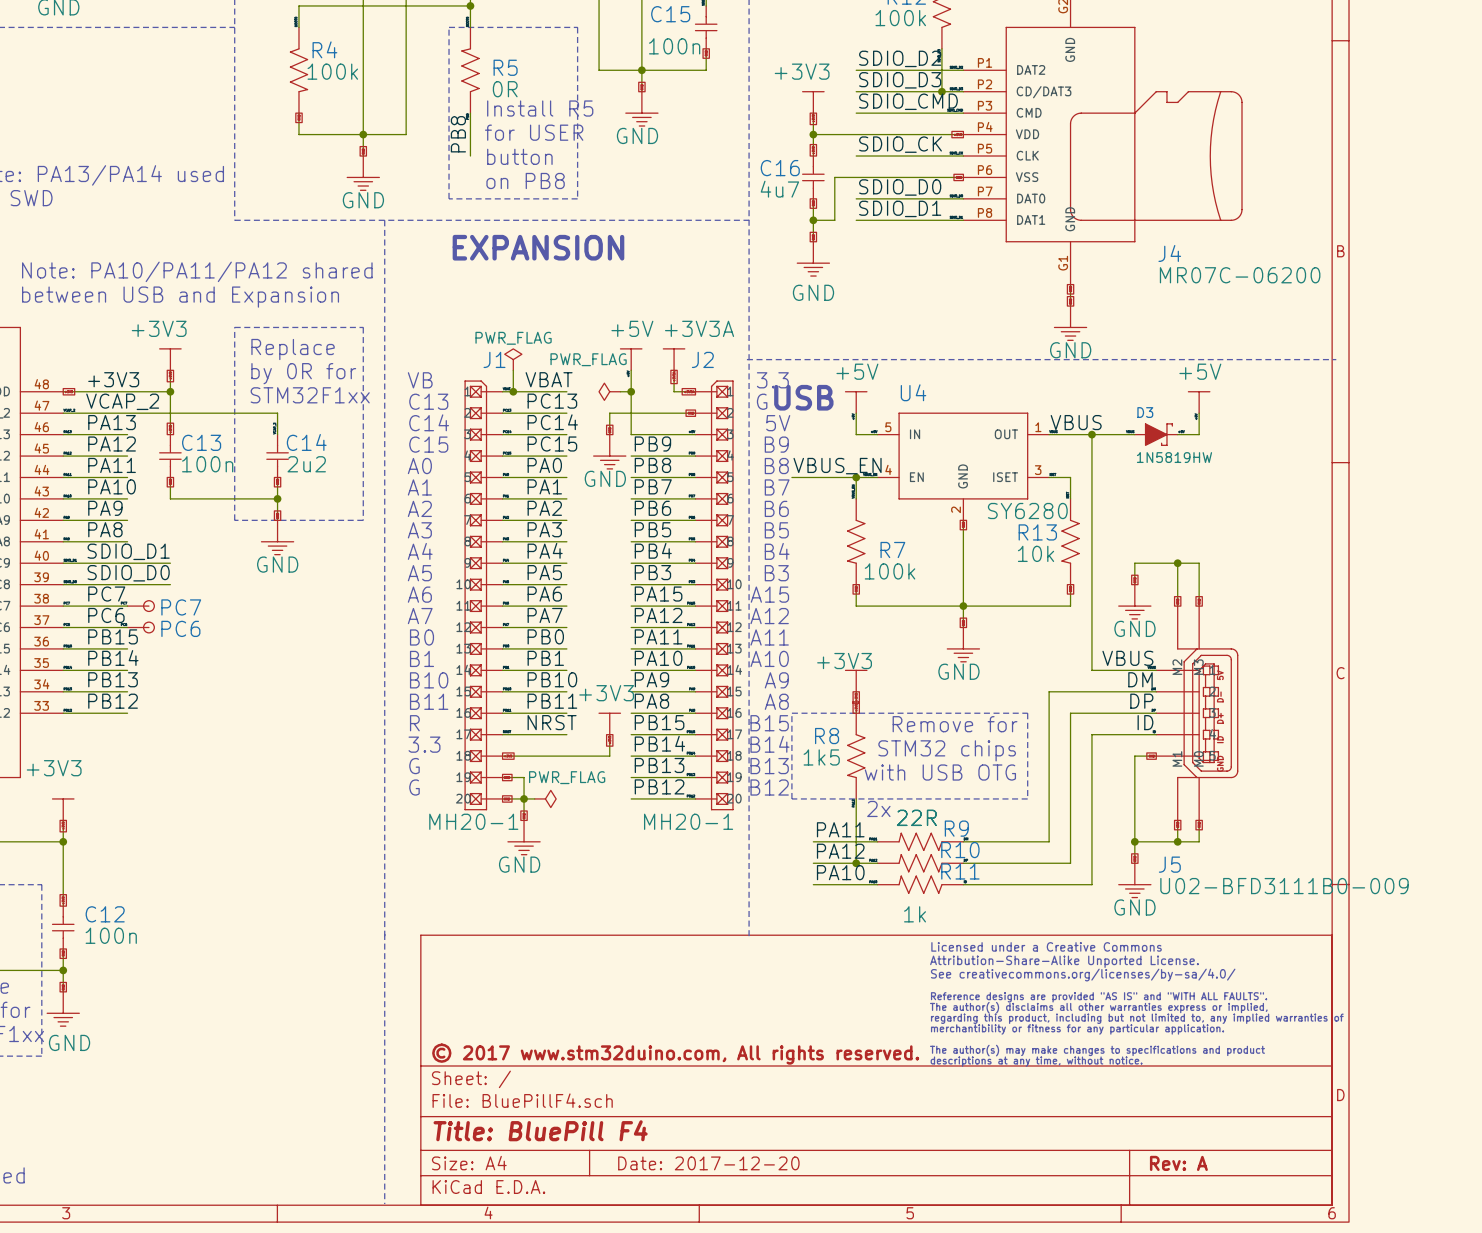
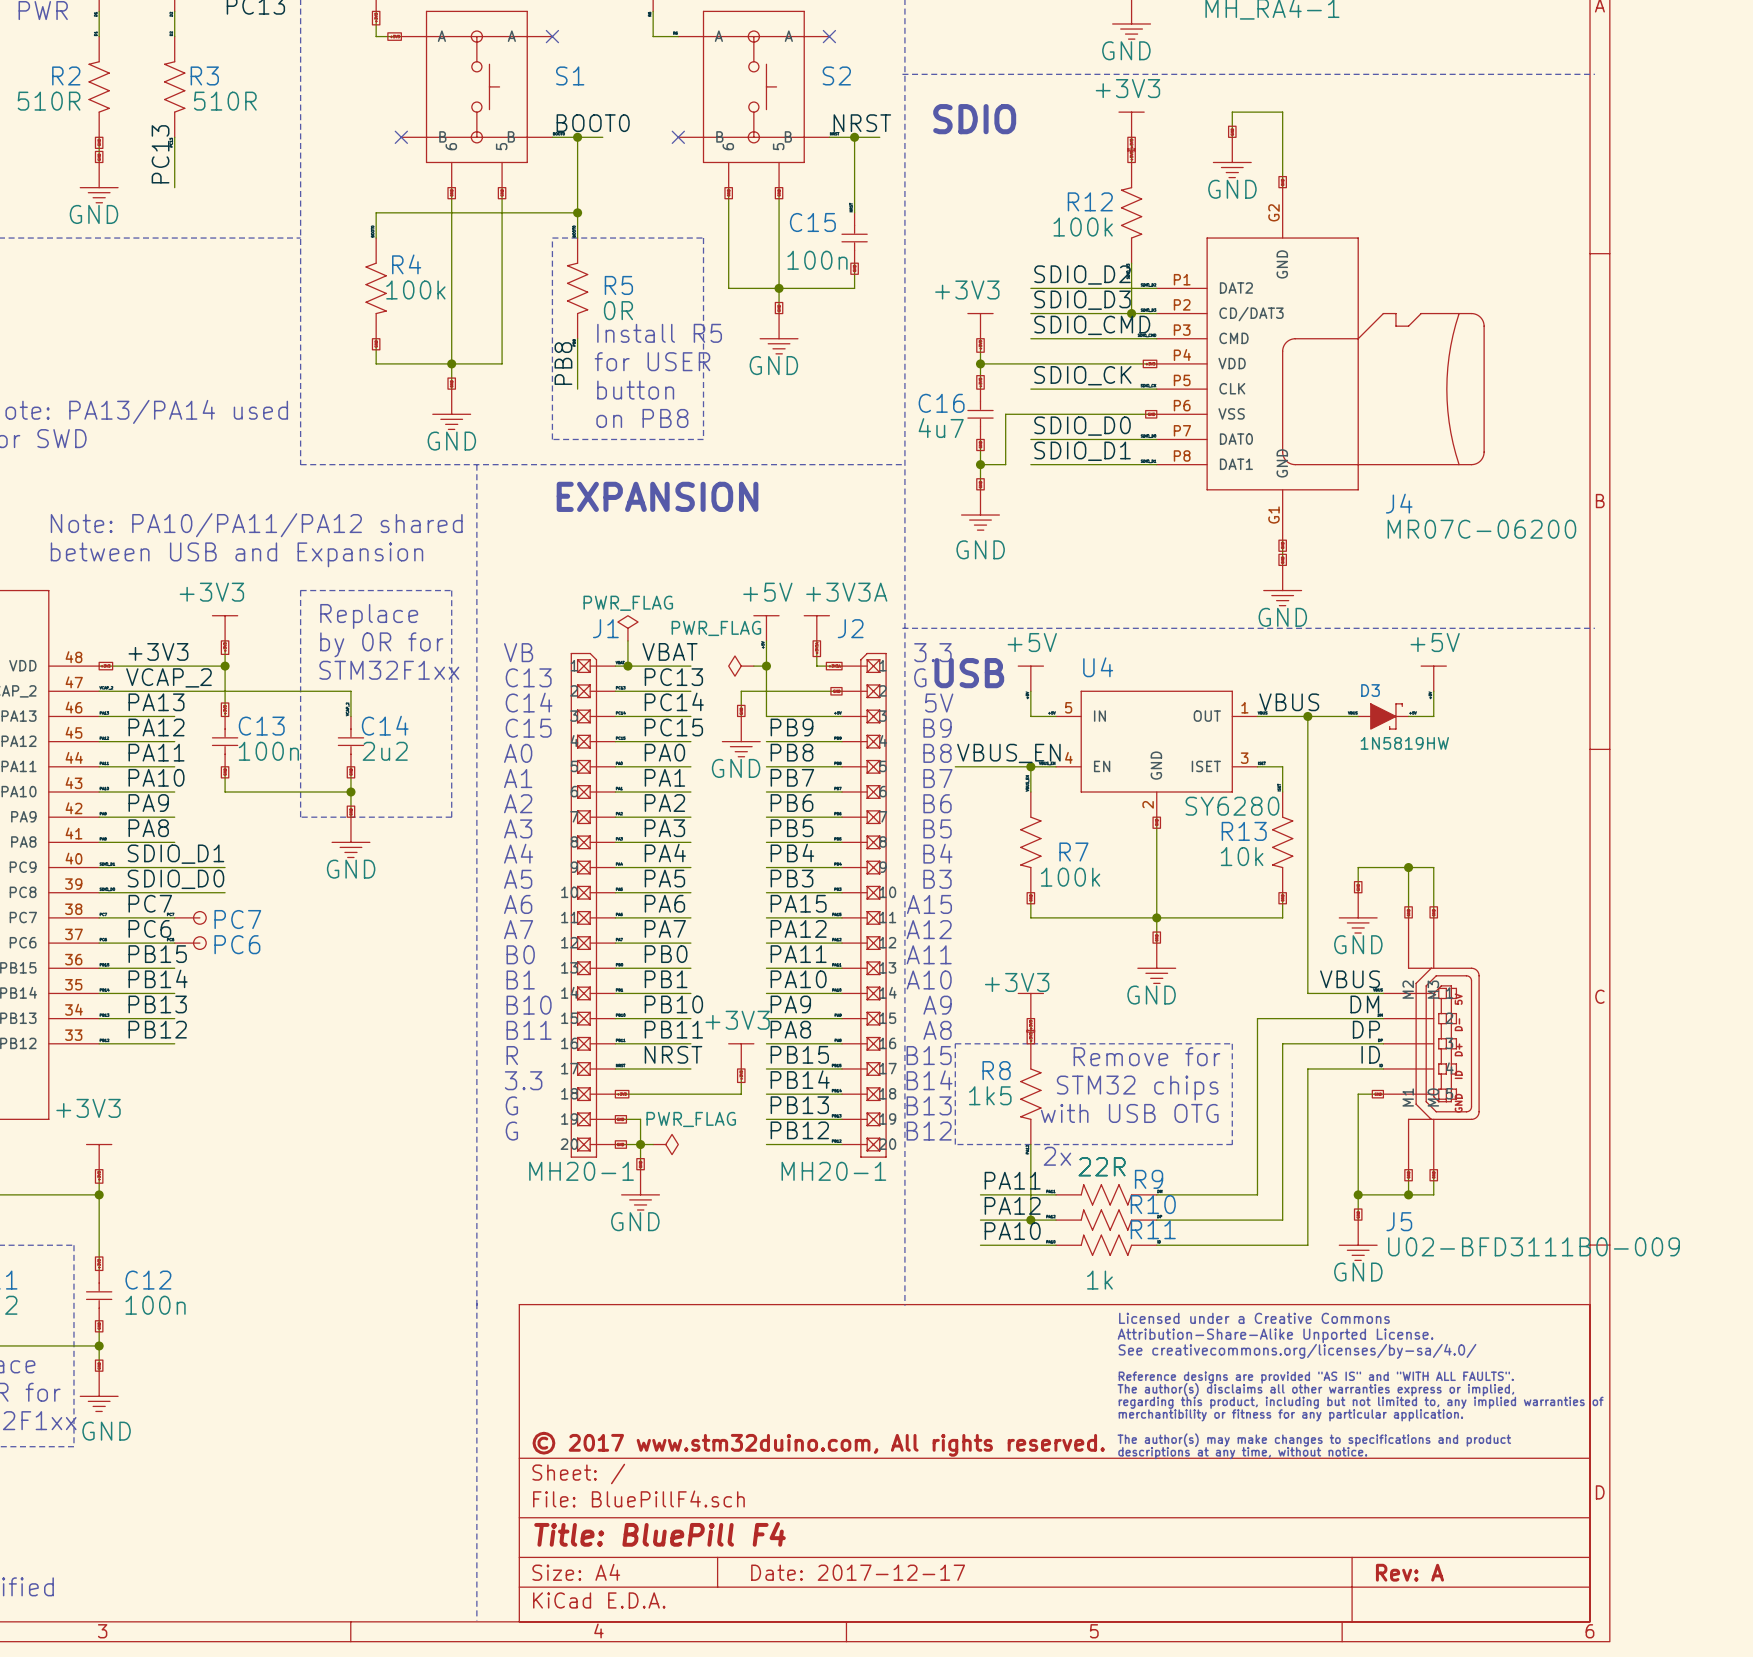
title block: Date: 2017-12-20 (708, 1163) -> Date: 2017-12-17 (858, 1572)

